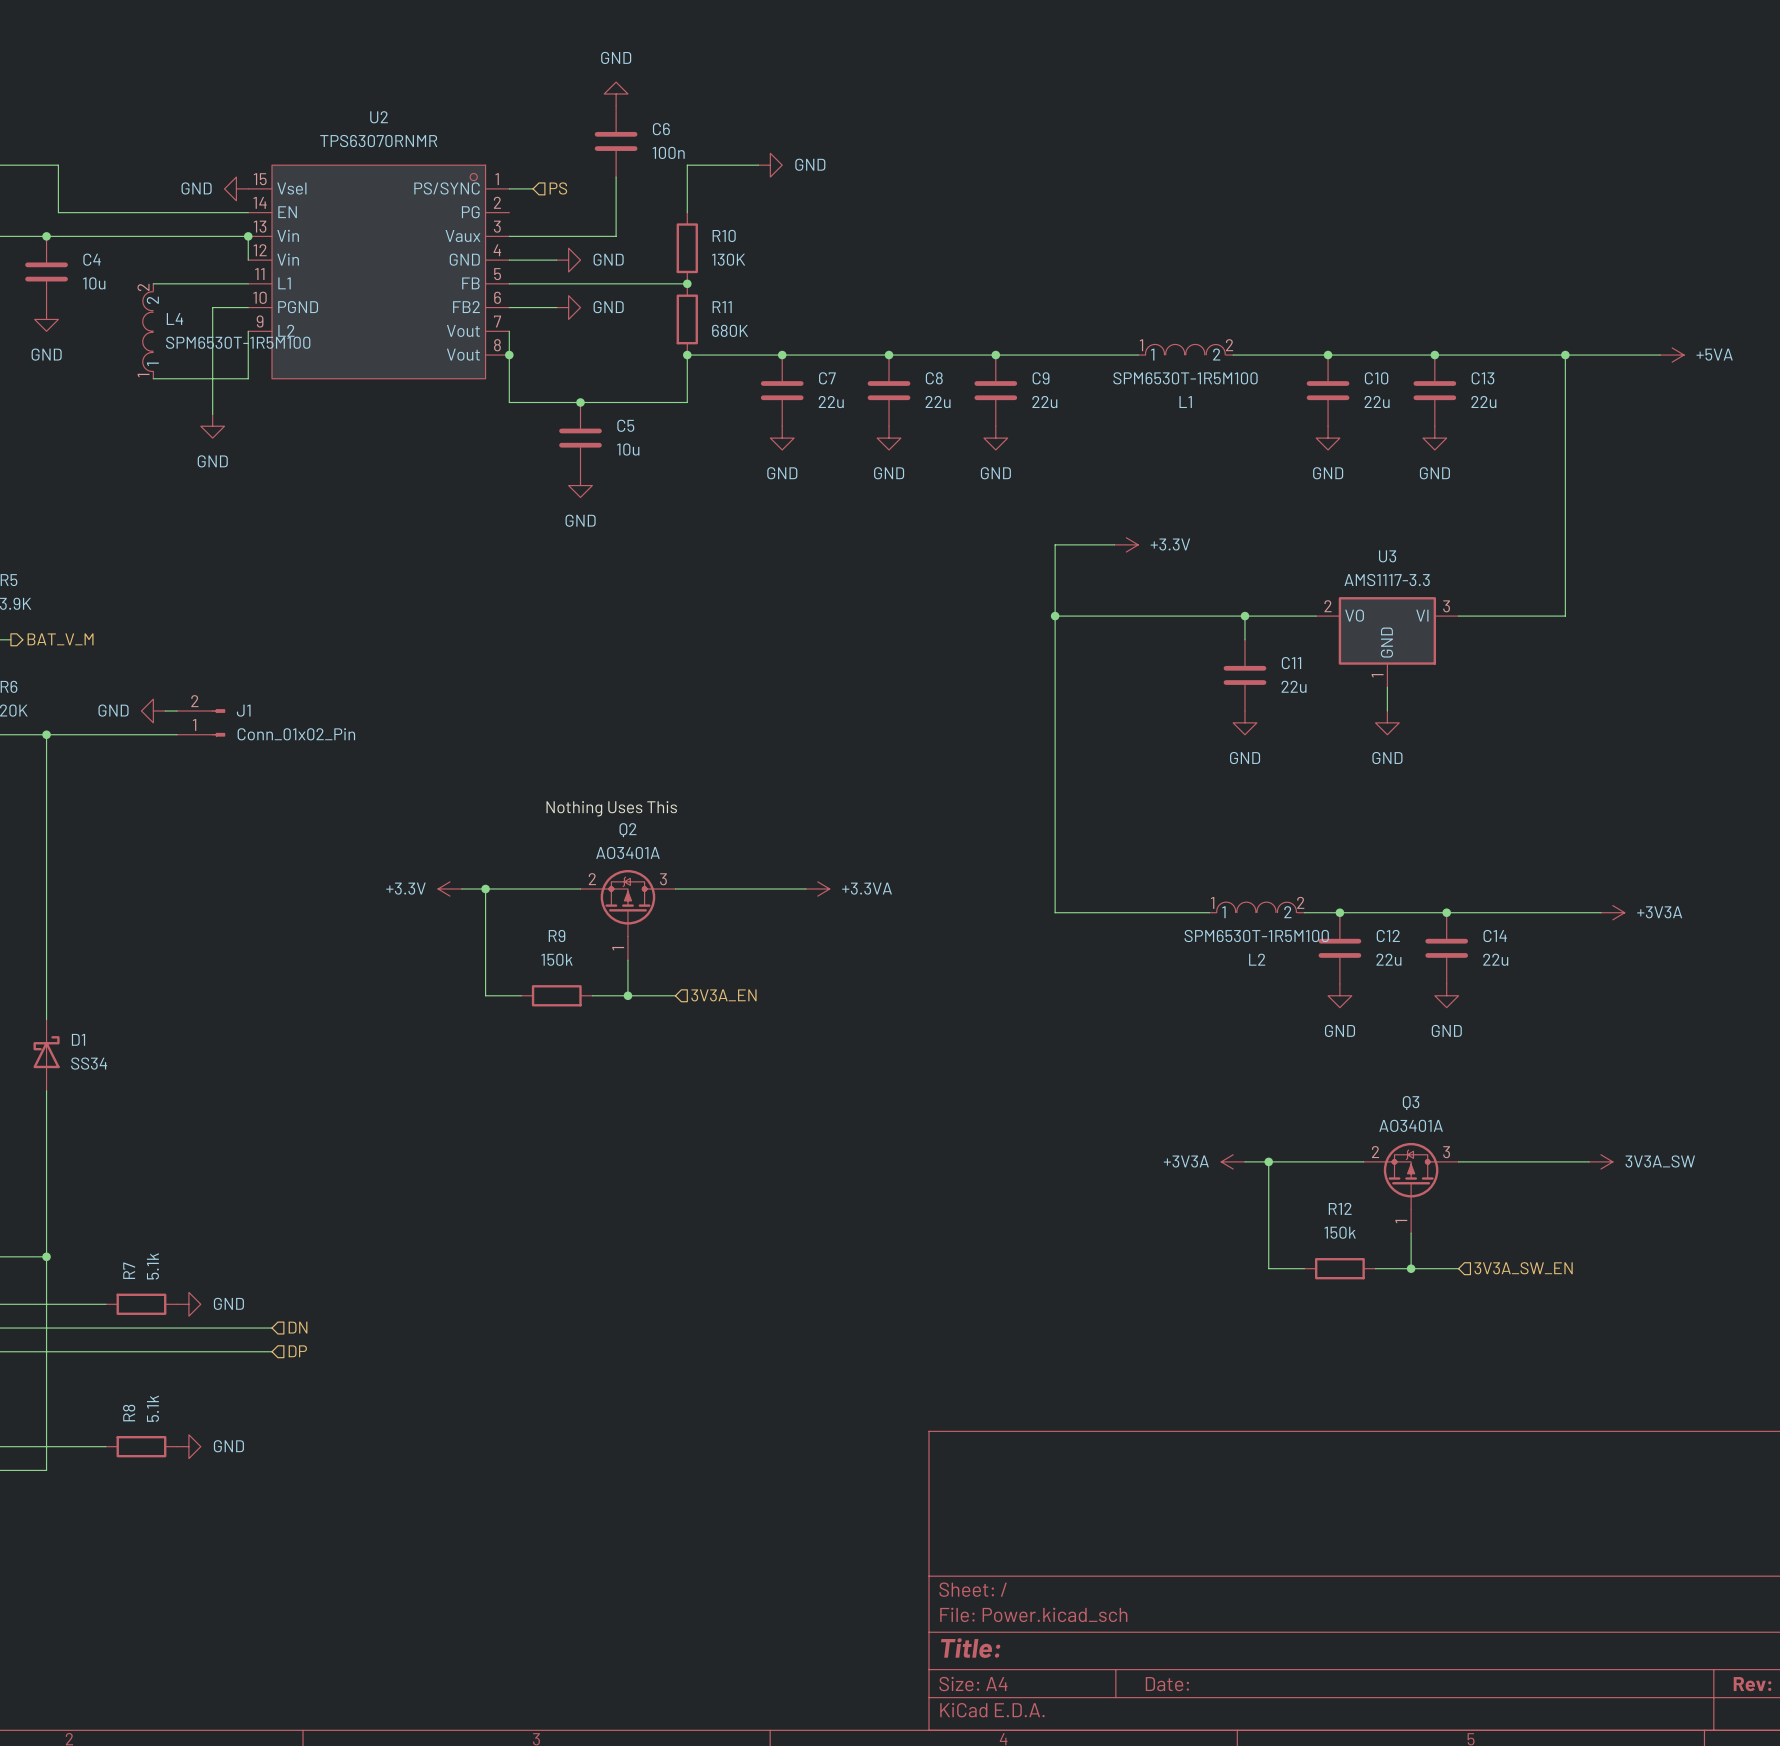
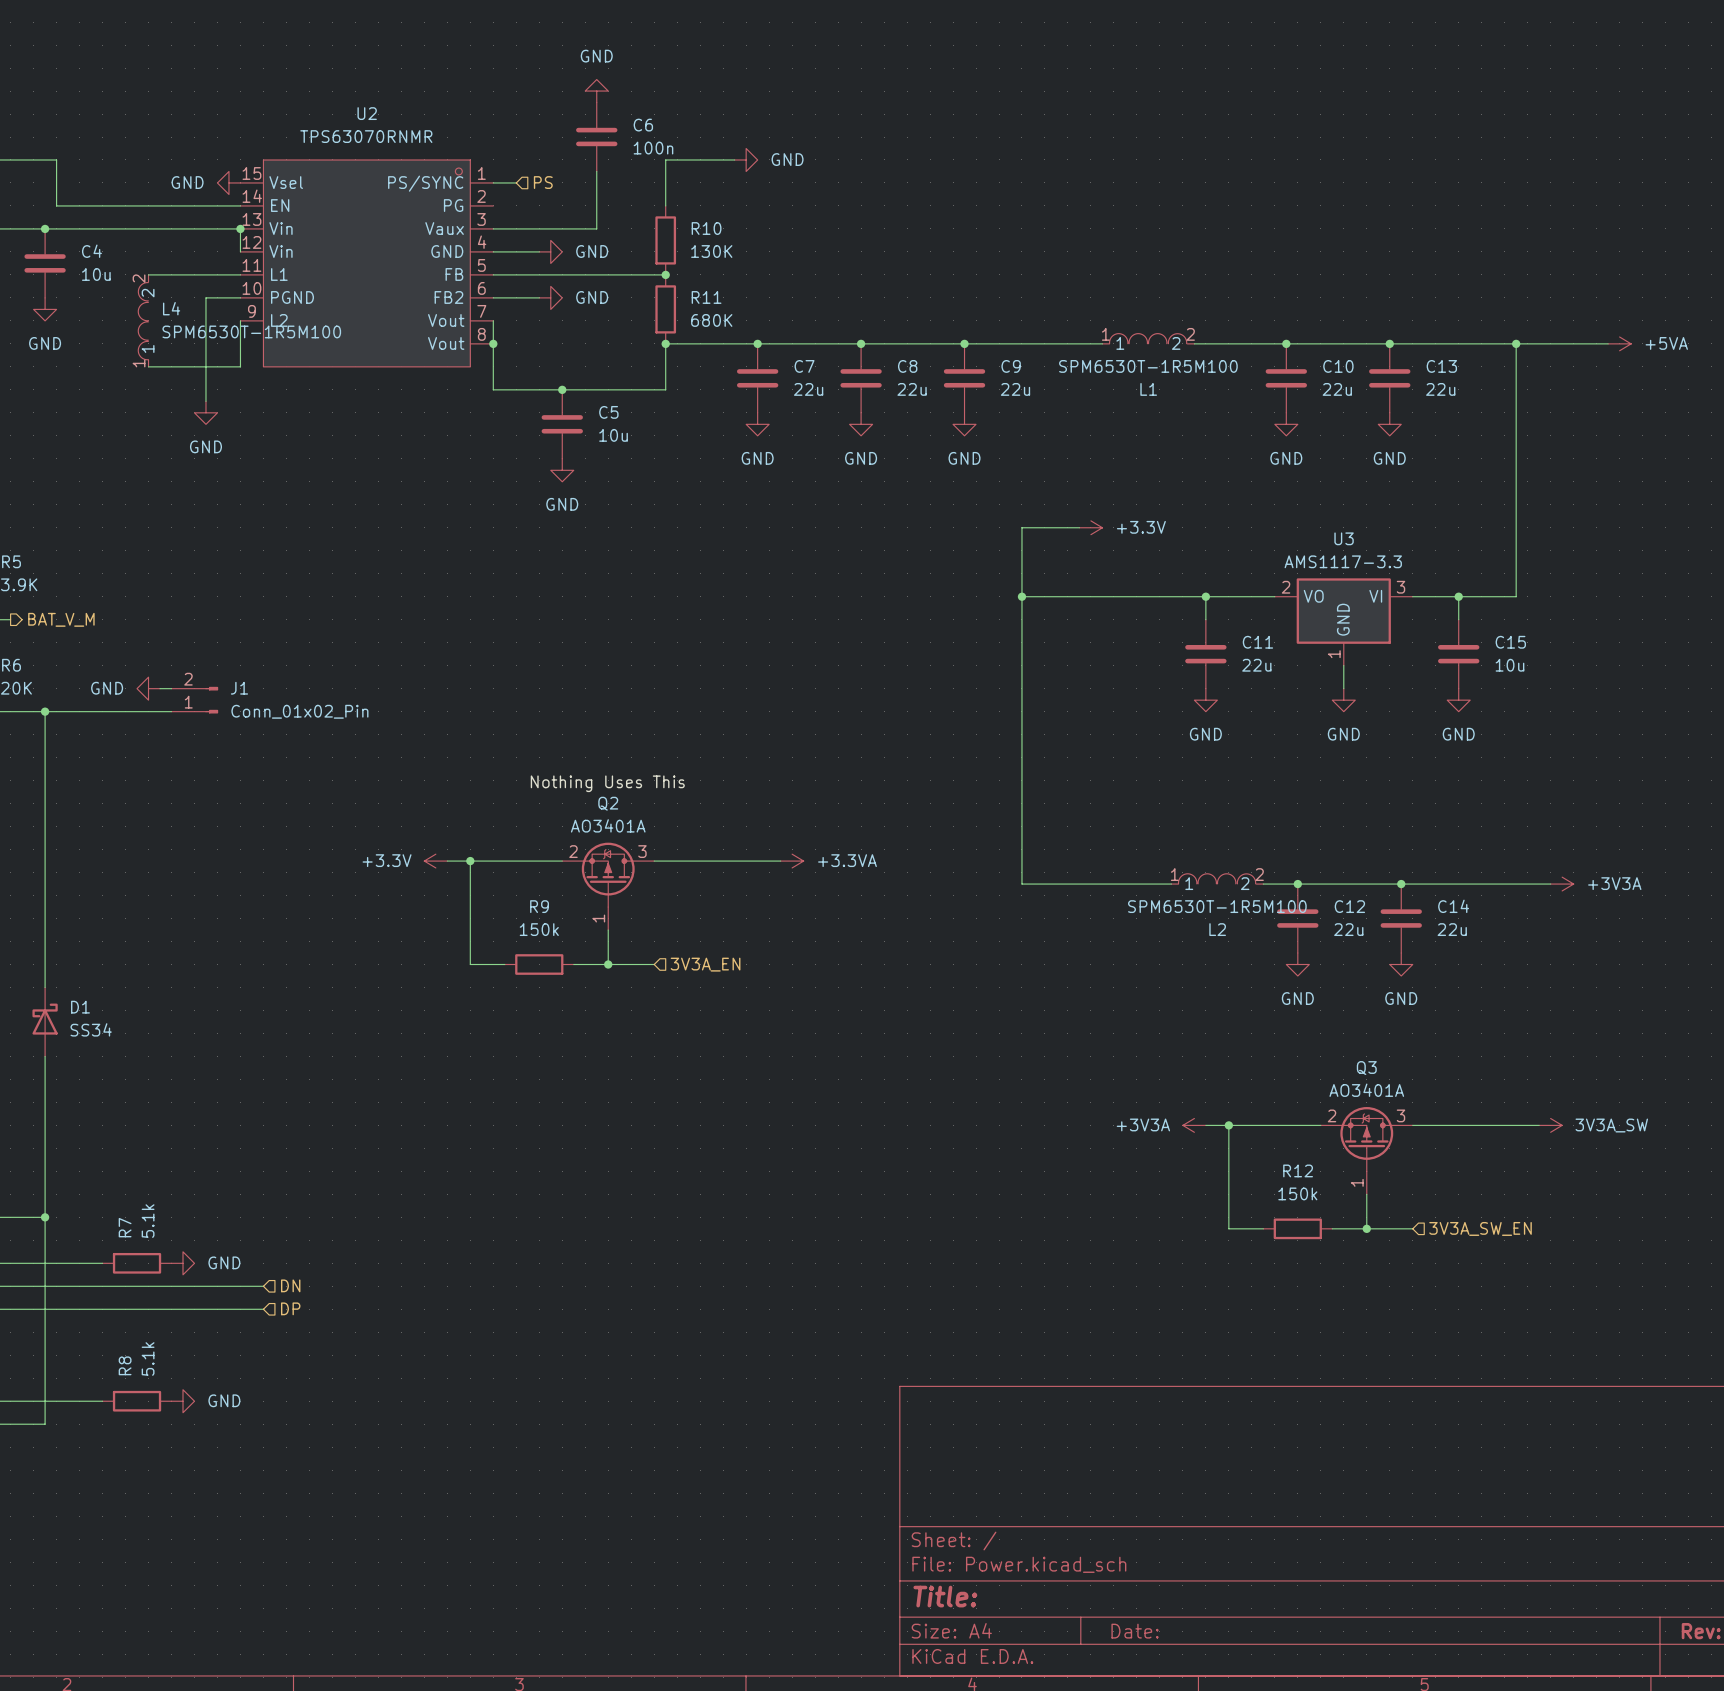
wire: none -> (1458, 596) (1458, 619)
junction: none -> (1458, 596)
C15: none -> 10u (1458, 654)
power symbol: none -> GND (1458, 700)

